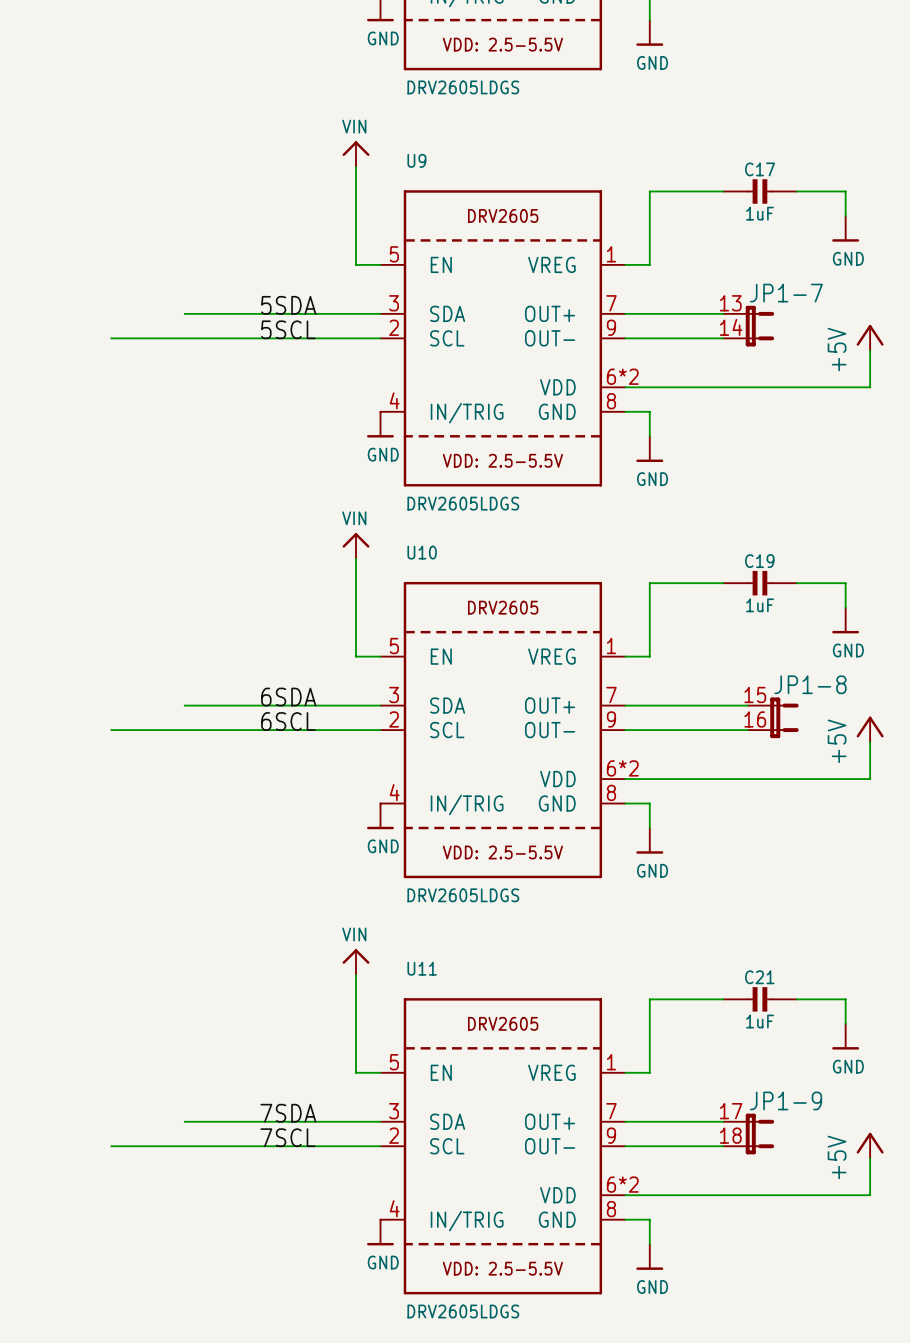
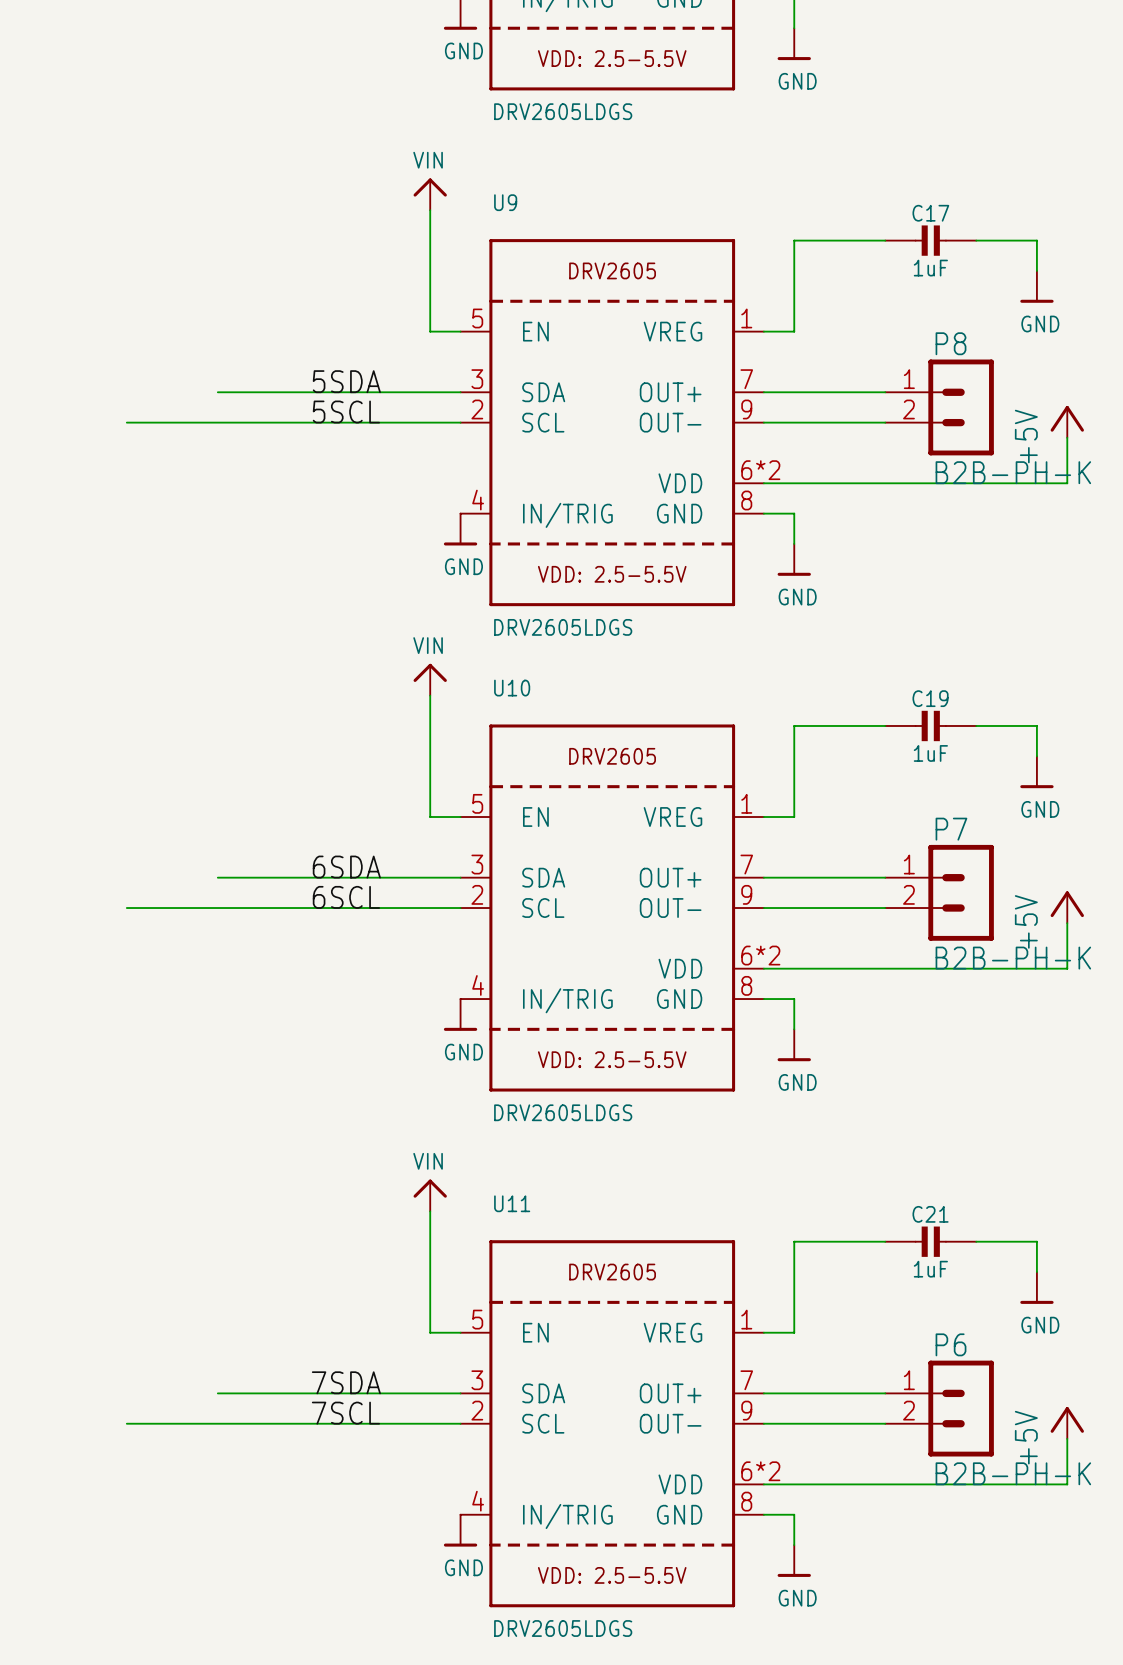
JP1-7: (748, 326) -> none
P8: none -> B2B-PH-K (939, 407)
P7: none -> B2B-PH-K (939, 892)
JP1-8: (773, 717) -> none
JP1-9: (748, 1134) -> none
P6: none -> B2B-PH-K (939, 1408)

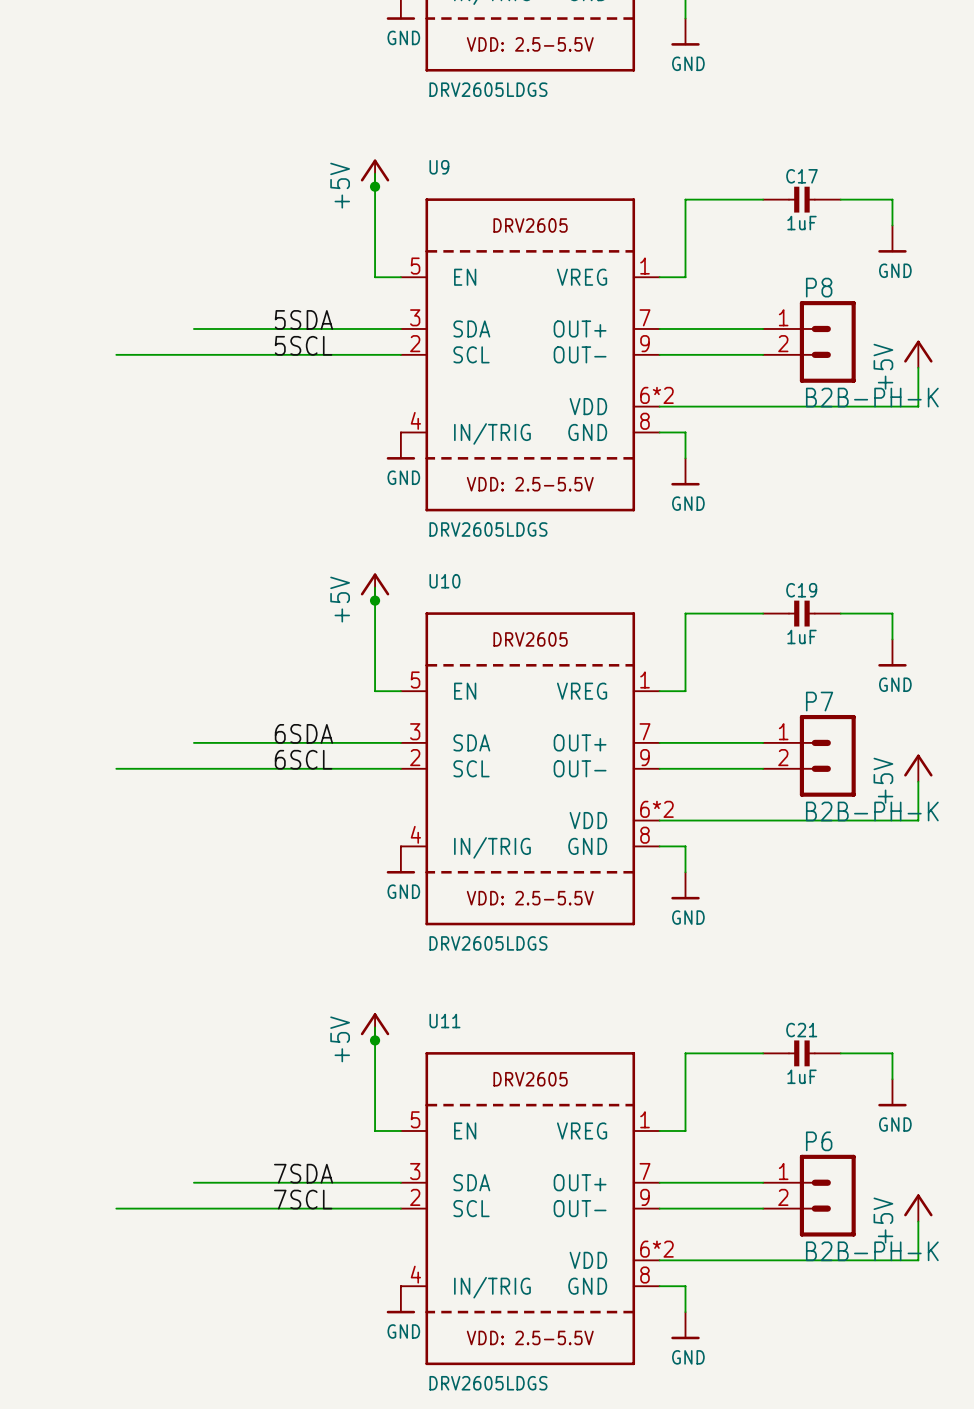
power symbol: VIN (430, 194) -> none
power symbol: none -> +5V (375, 173)
junction: none -> (375, 186)
power symbol: VIN (430, 679) -> none
power symbol: none -> +5V (375, 587)
junction: none -> (375, 600)
power symbol: VIN (430, 1195) -> none
power symbol: none -> +5V (375, 1026)
junction: none -> (375, 1040)

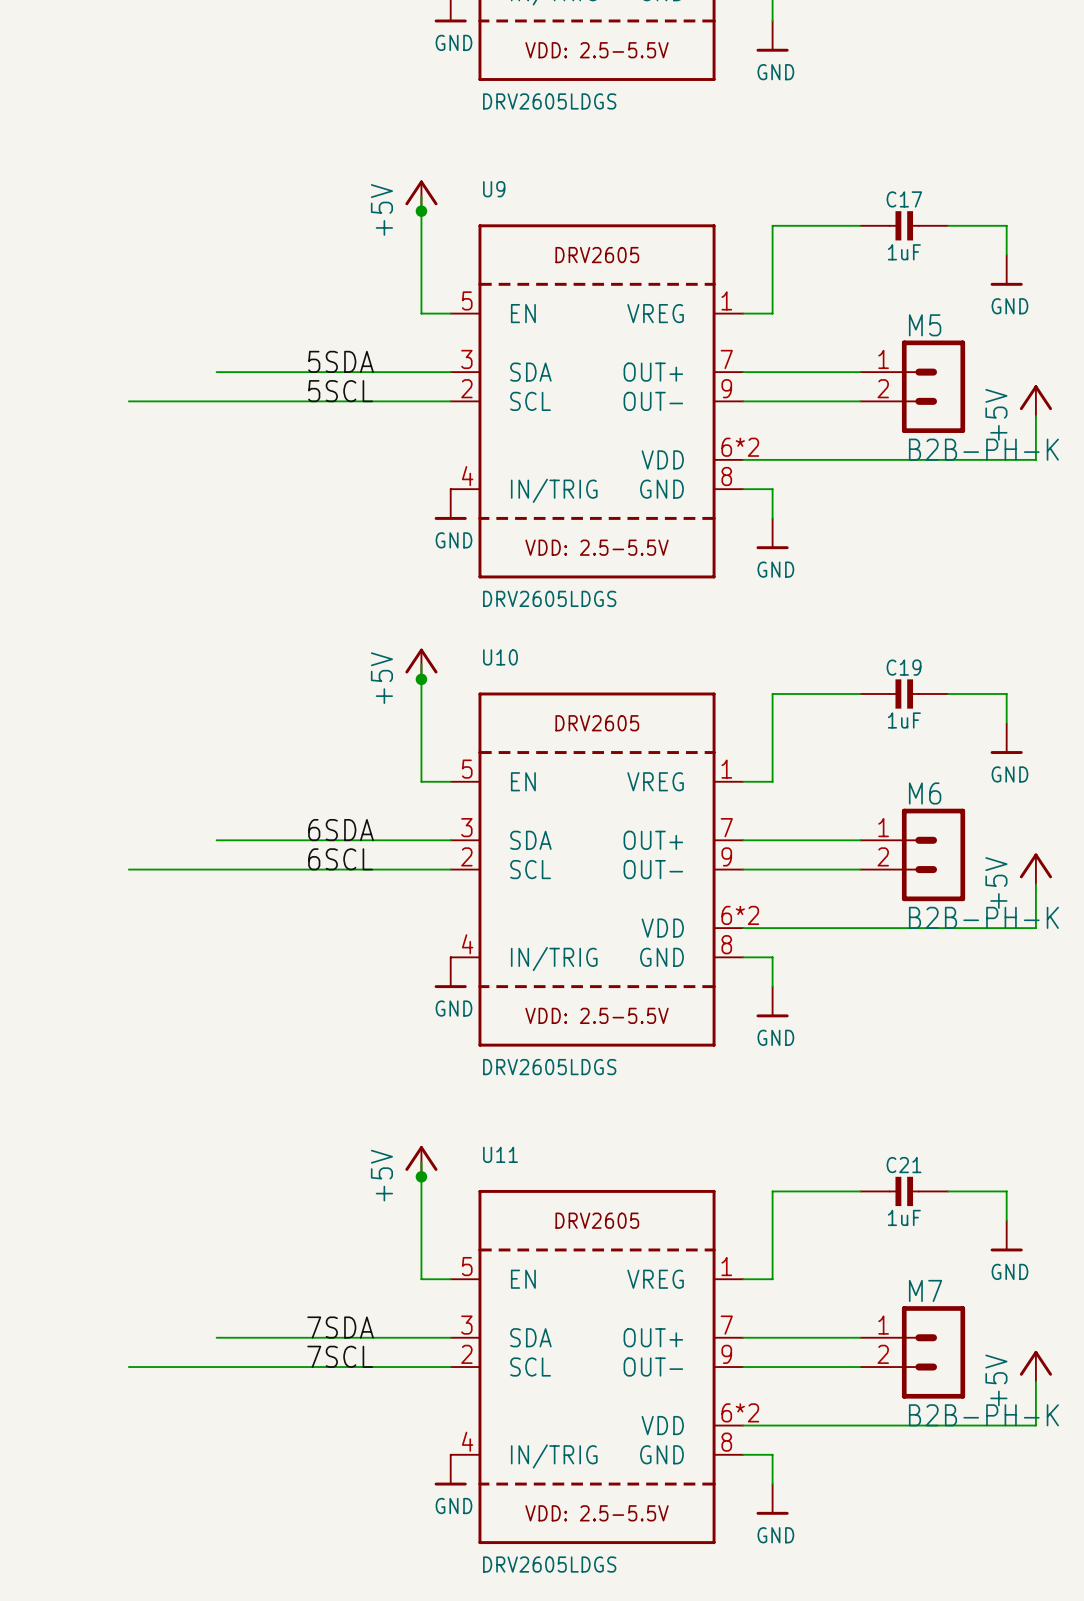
P8 name: P8 (819, 287) -> M5 (925, 325)
P7 name: P7 (819, 701) -> M6 (925, 793)
P6 name: P6 (819, 1141) -> M7 (925, 1290)

